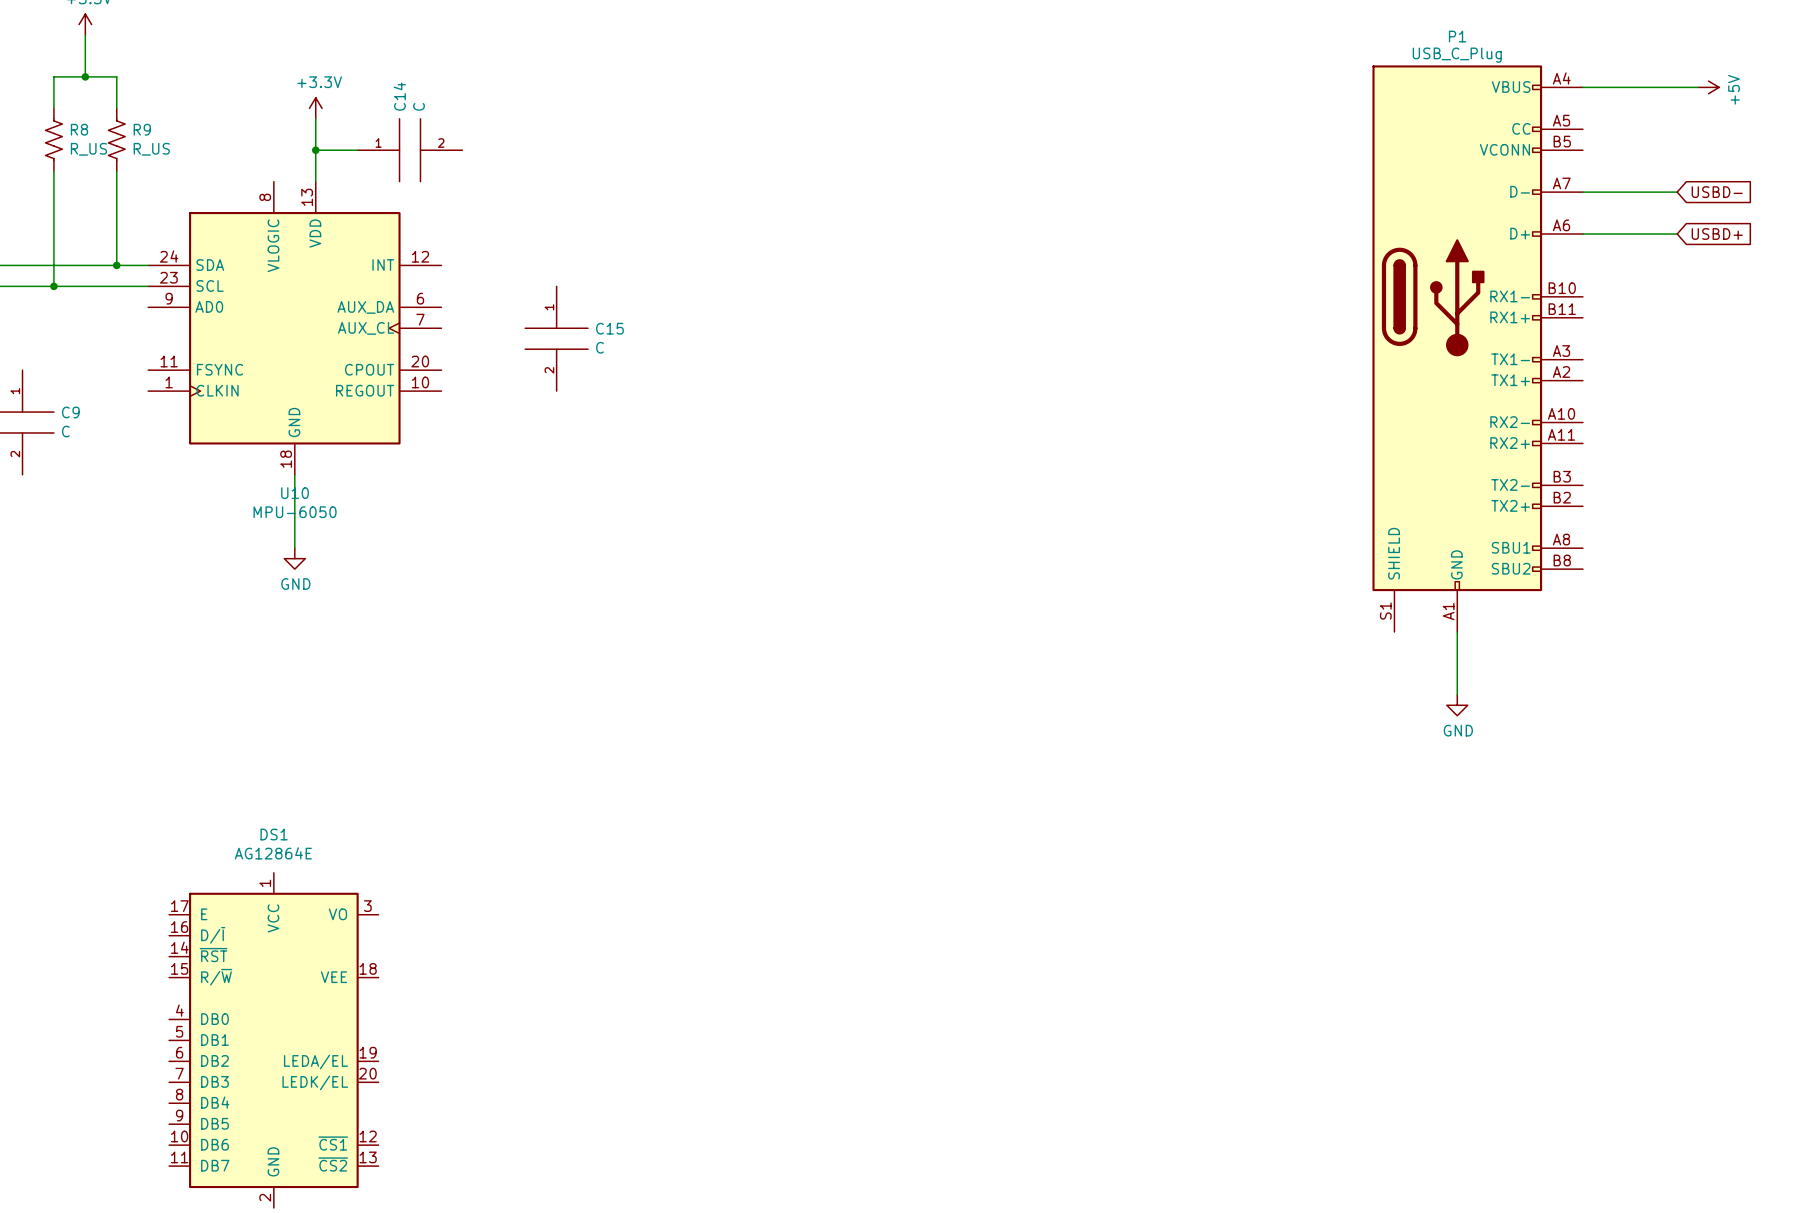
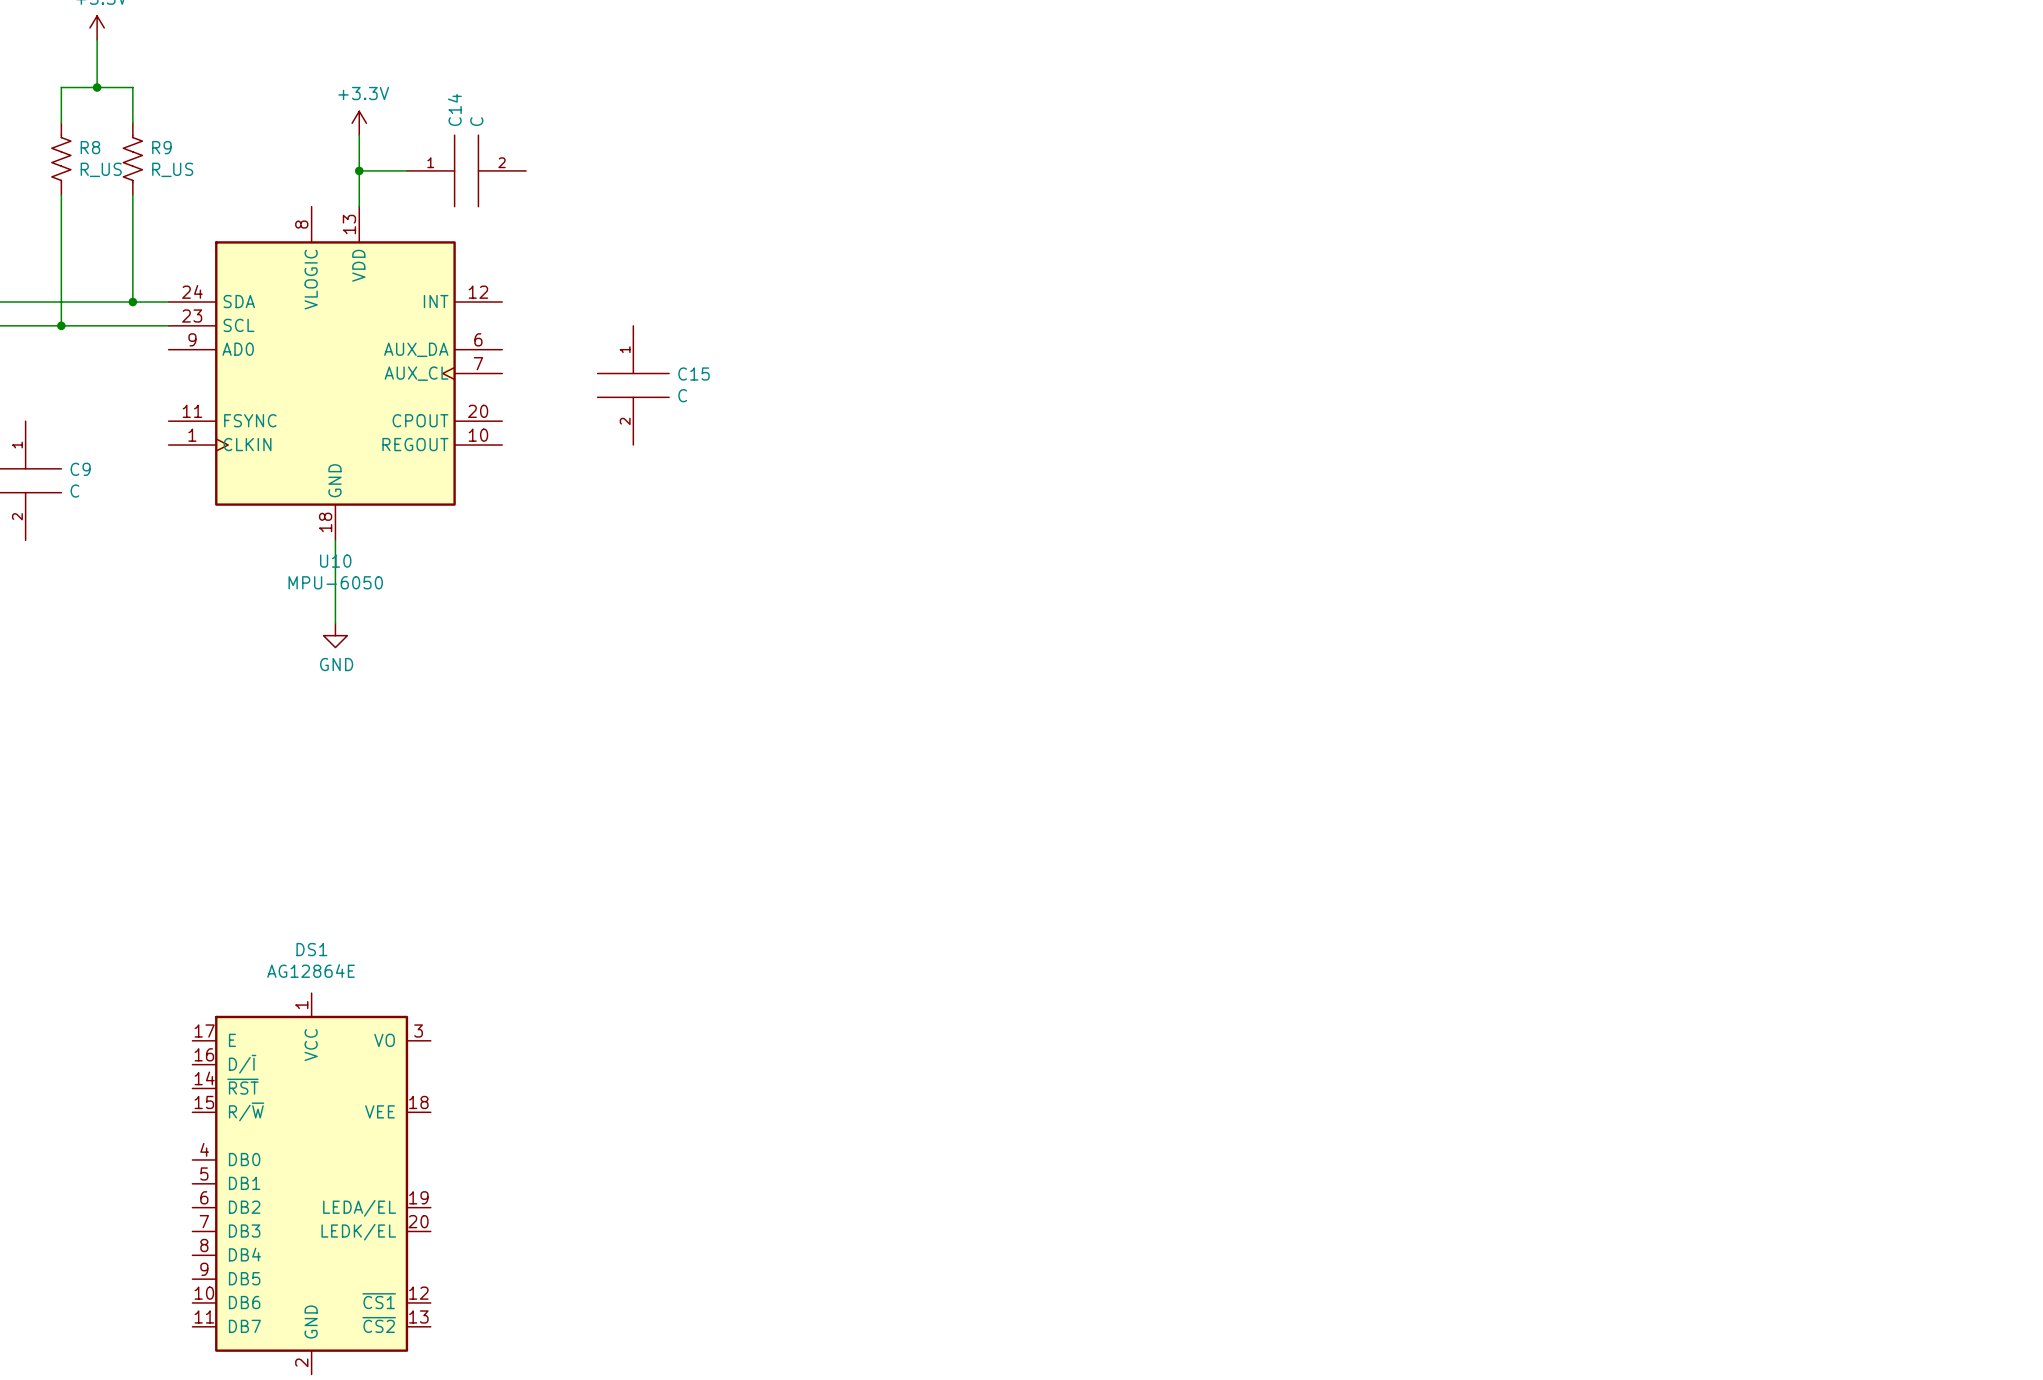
wire: (1582, 87) (1698, 87) -> none
power symbol: +5V (1708, 87) -> none
wire: (1582, 192) (1677, 192) -> none
global label: USBD- (1717, 192) -> none
wire: (1582, 234) (1677, 234) -> none
global label: USBD+ (1717, 234) -> none
P1: USB_C_Plug (1477, 348) -> none
wire: (1457, 631) (1457, 694) -> none
power symbol: GND (1457, 705) -> none

